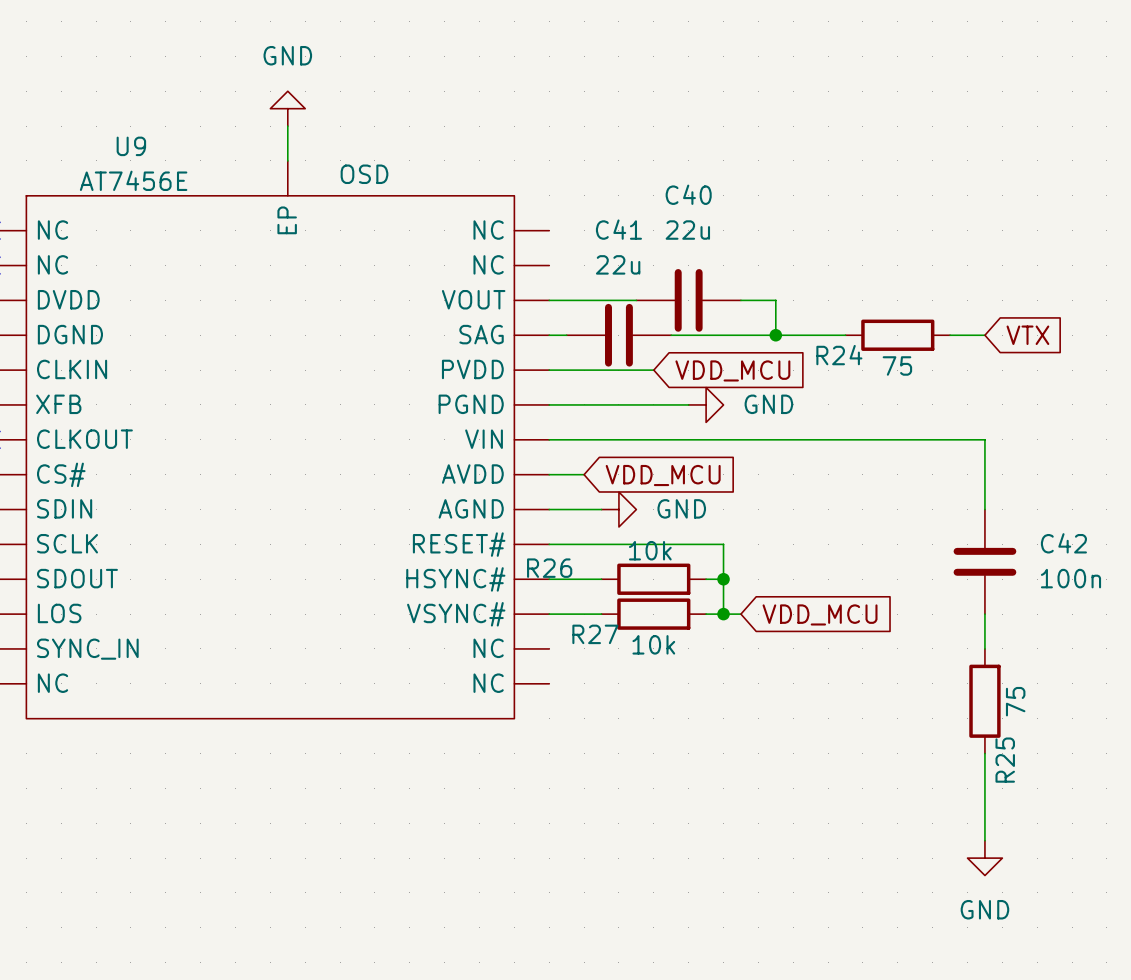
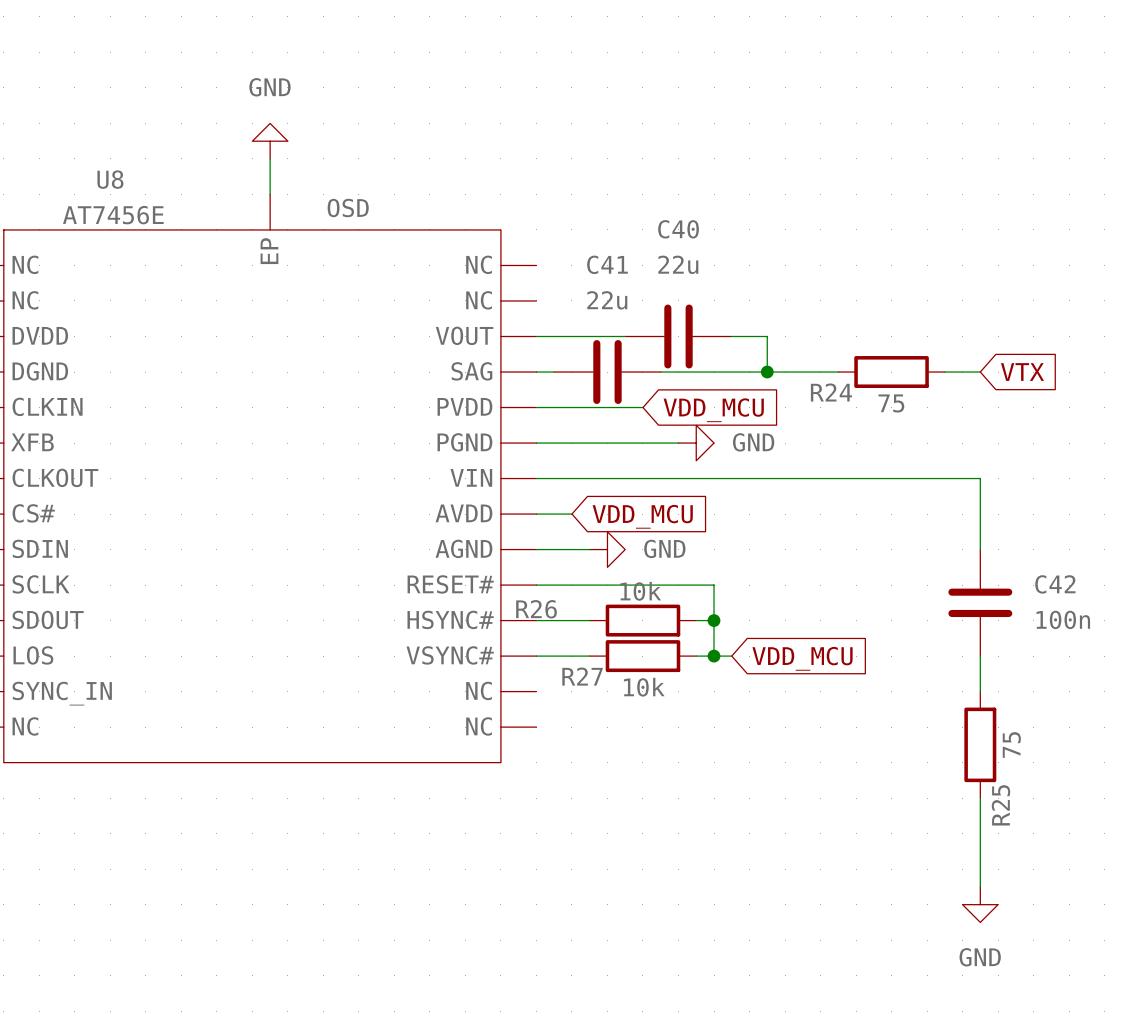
U9 name: U9 (131, 146) -> U8 (110, 179)

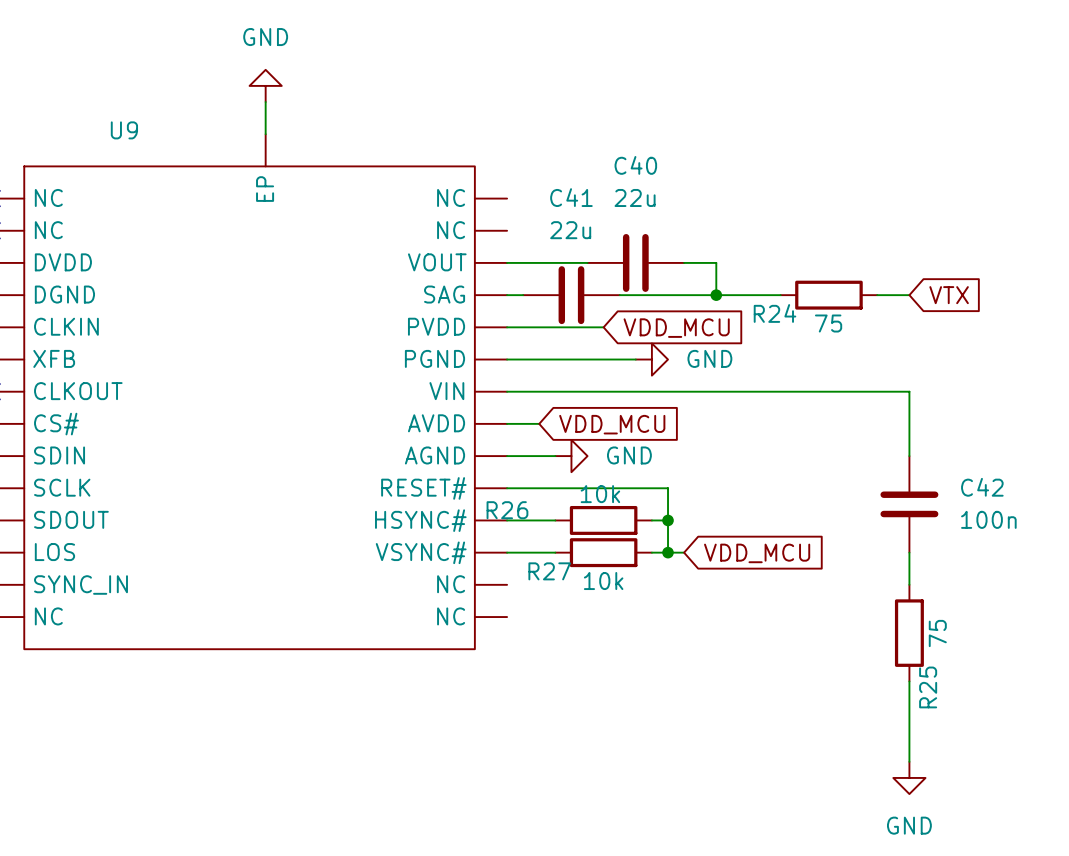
U8 name: U8 (110, 179) -> U9 (124, 130)
U8 text: OSD (348, 208) -> none
U8 value: AT7456E (113, 215) -> none

